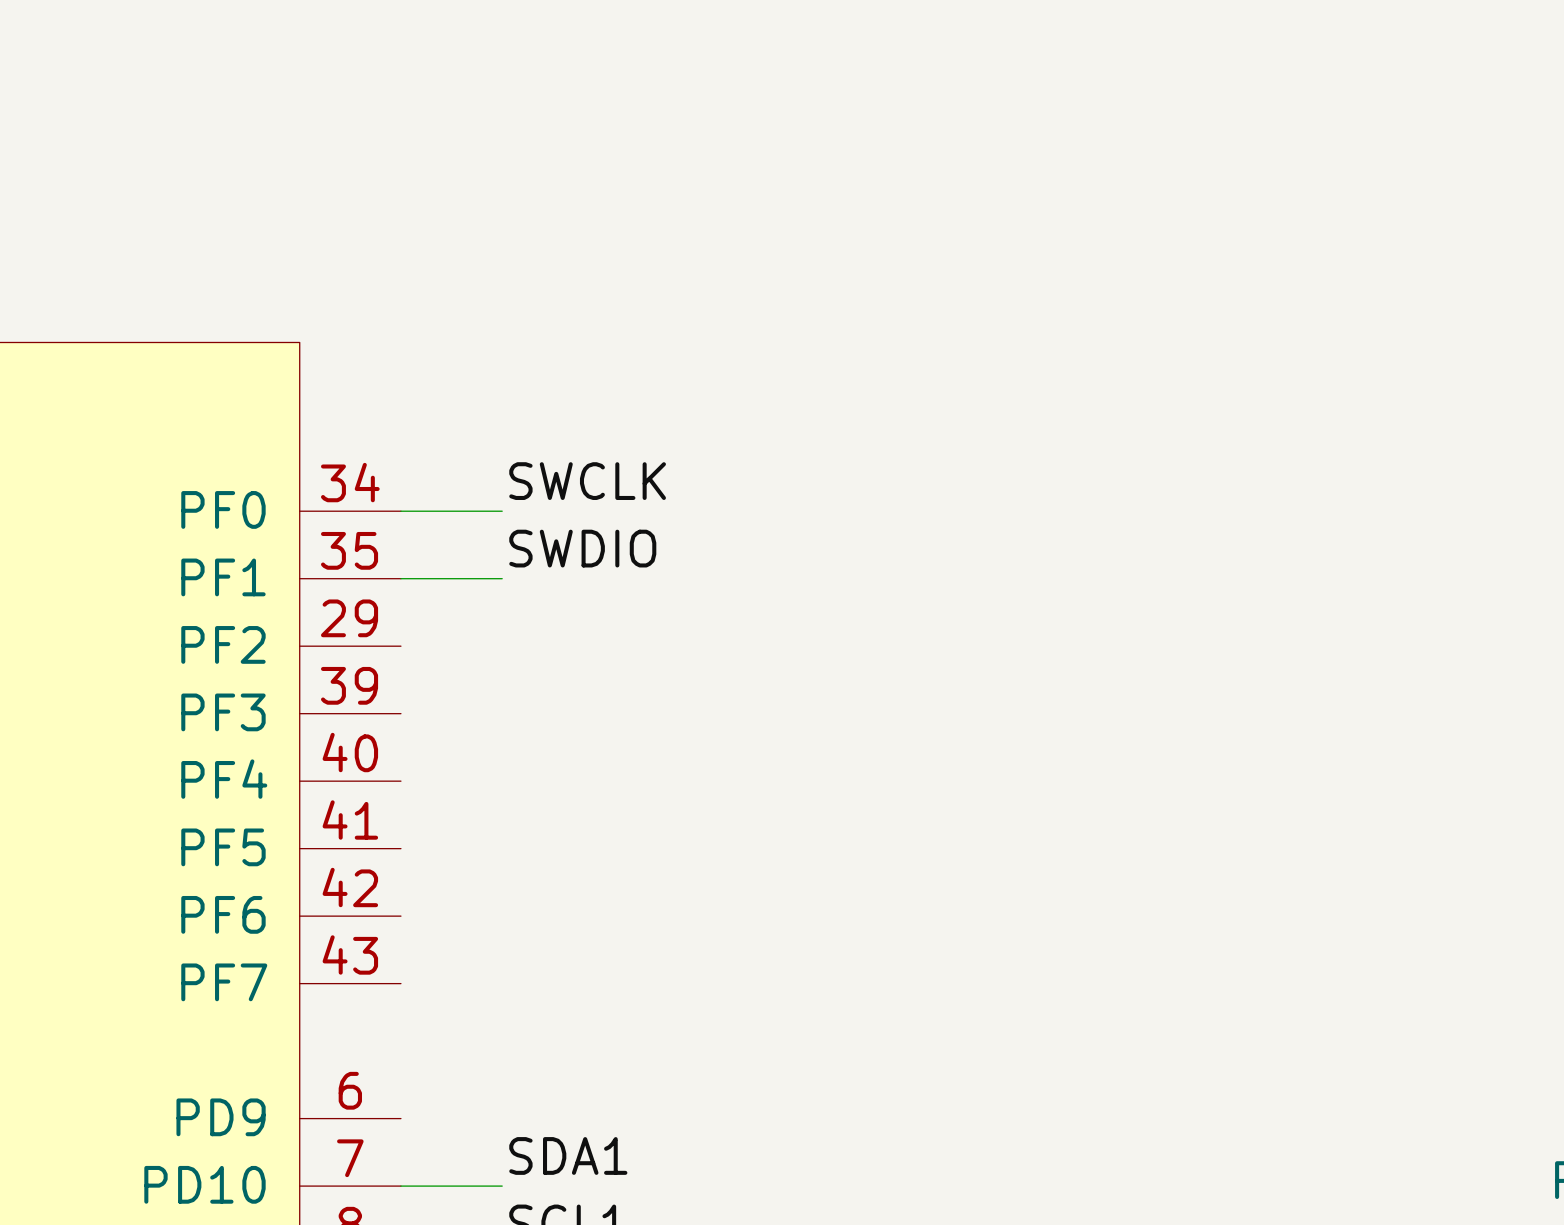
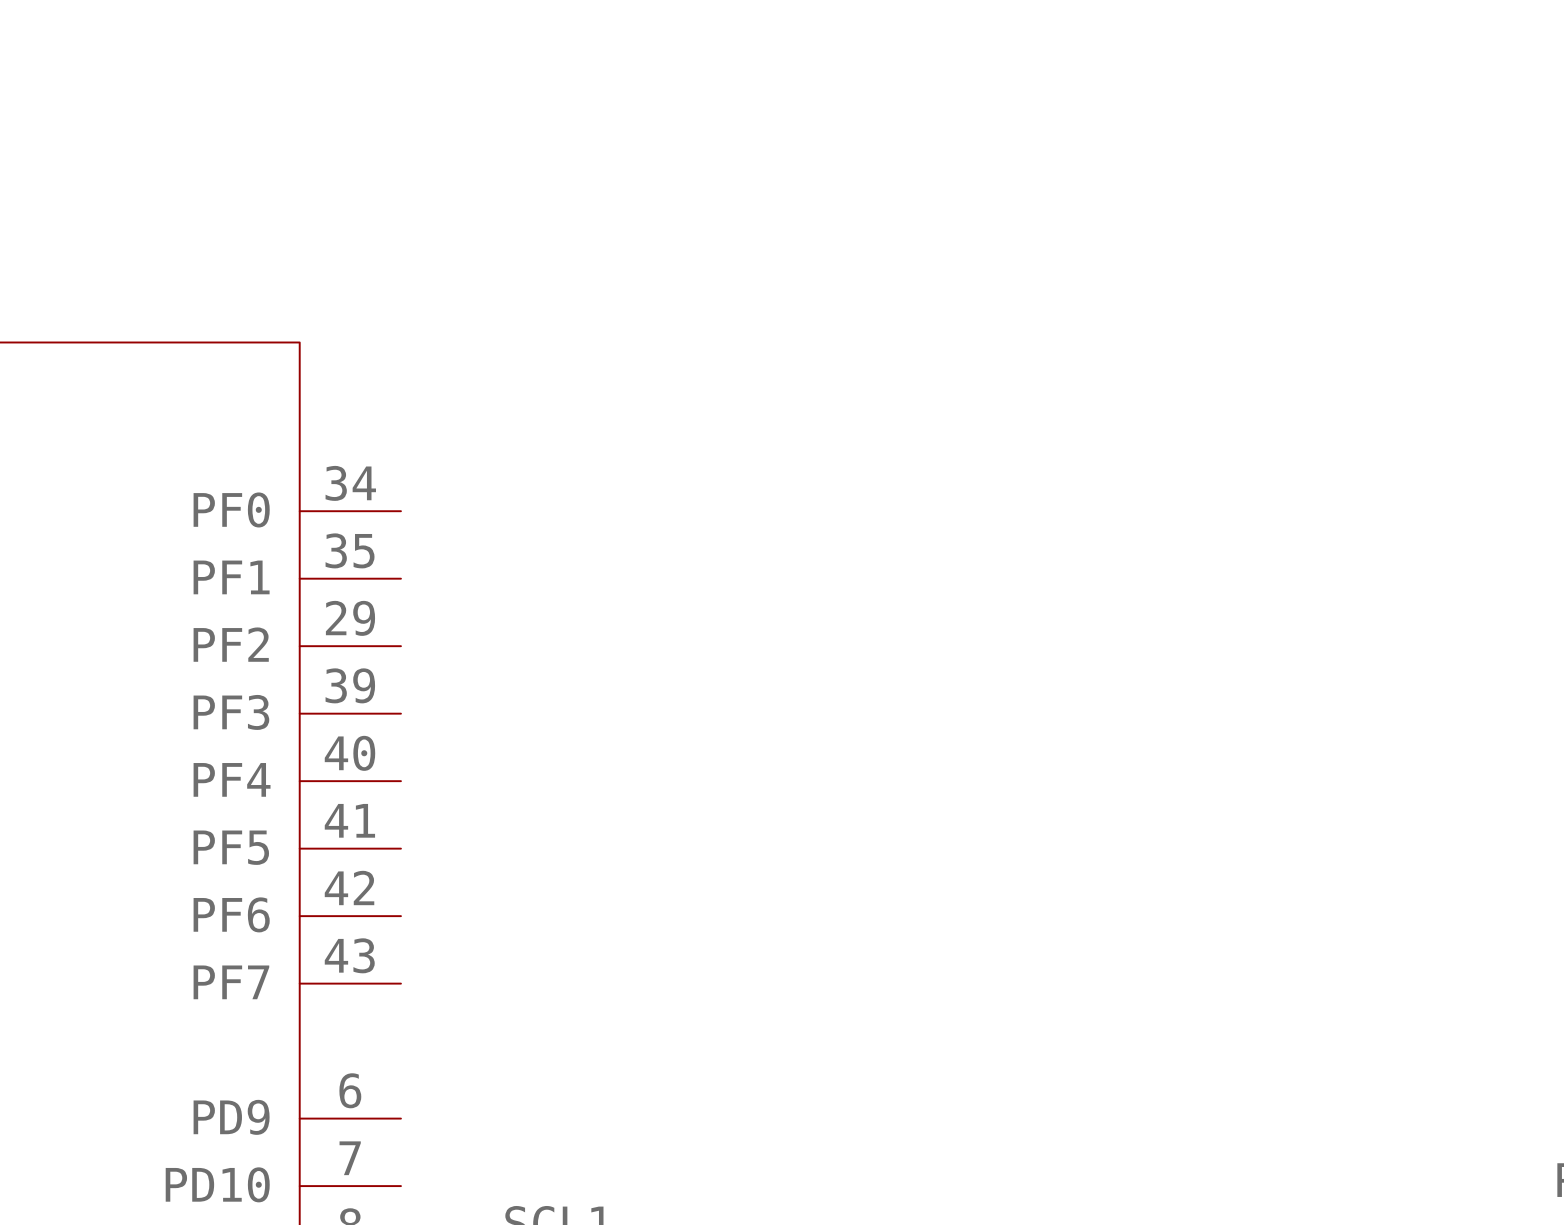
label: SWCLK (587, 481) -> none
wire: (400, 511) (502, 511) -> none
label: SWDIO (582, 548) -> none
wire: (400, 578) (502, 578) -> none
label: SDA1 (568, 1155) -> none
wire: (400, 1186) (502, 1186) -> none

